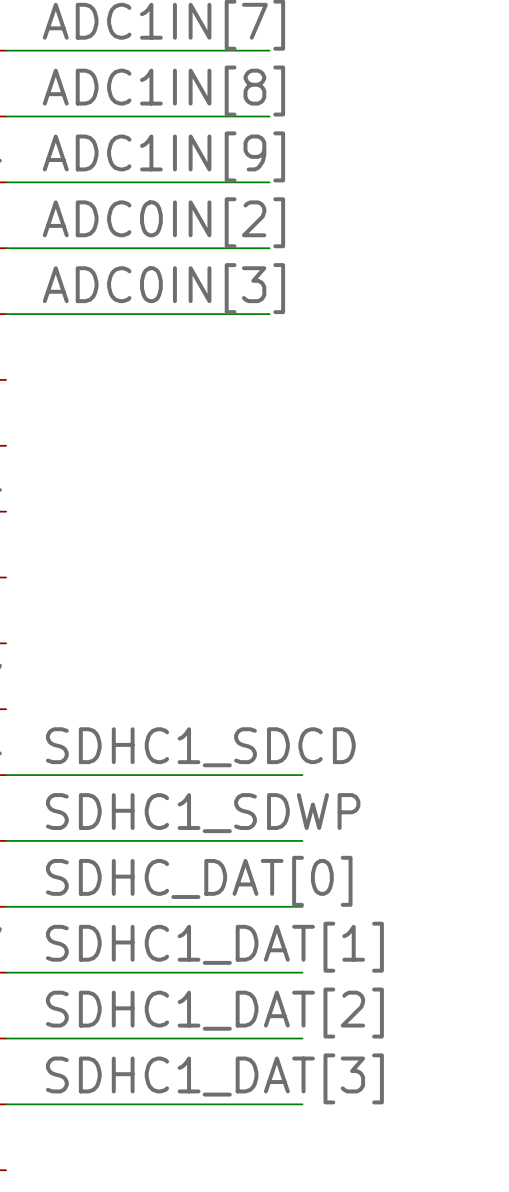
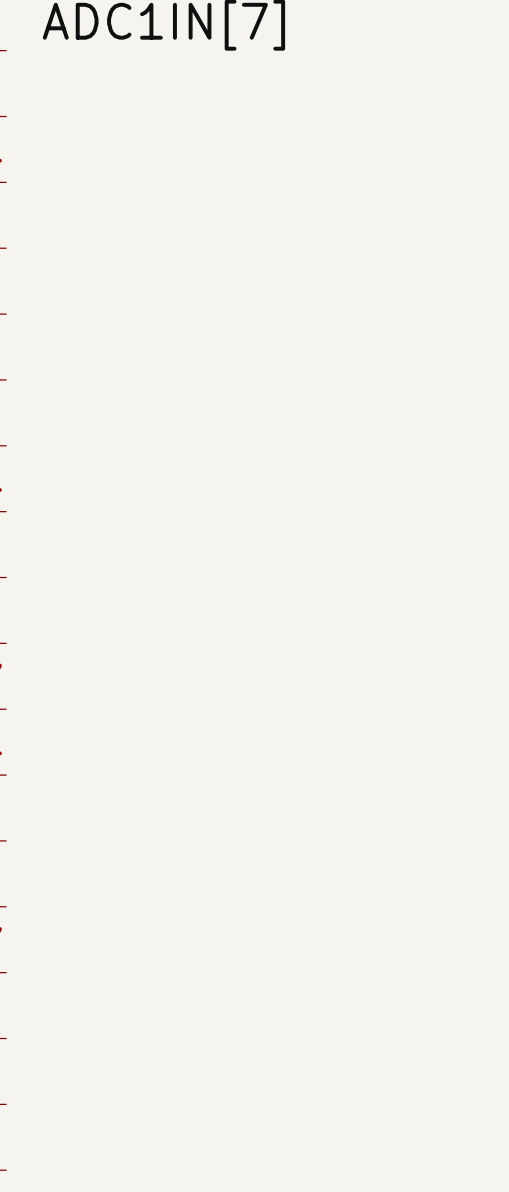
wire: (6, 50) (269, 50) -> none
label: ADC1IN[8] (163, 91) -> none
wire: (6, 116) (269, 116) -> none
label: ADC1IN[9] (163, 156) -> none
wire: (6, 182) (269, 182) -> none
label: ADC0IN[2] (163, 222) -> none
wire: (6, 248) (269, 248) -> none
label: ADC0IN[3] (163, 288) -> none
wire: (6, 314) (269, 314) -> none
label: SDHC1_SDCD (200, 747) -> none
wire: (6, 775) (302, 775) -> none
label: SDHC1_SDWP (203, 813) -> none
wire: (6, 840) (302, 840) -> none
label: SDHC_DAT[0] (199, 881) -> none
wire: (6, 906) (302, 906) -> none
label: SDHC1_DAT[1] (214, 947) -> none
wire: (6, 972) (302, 972) -> none
label: SDHC1_DAT[2] (214, 1013) -> none
wire: (6, 1038) (302, 1038) -> none
label: SDHC1_DAT[3] (214, 1078) -> none
wire: (6, 1104) (302, 1104) -> none

